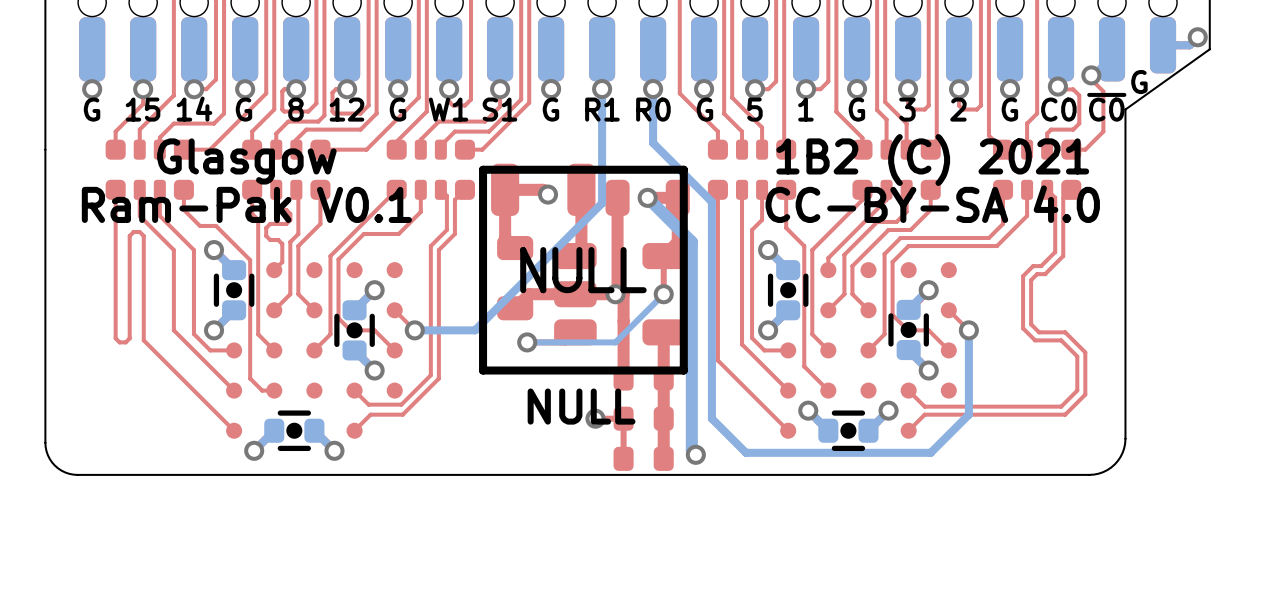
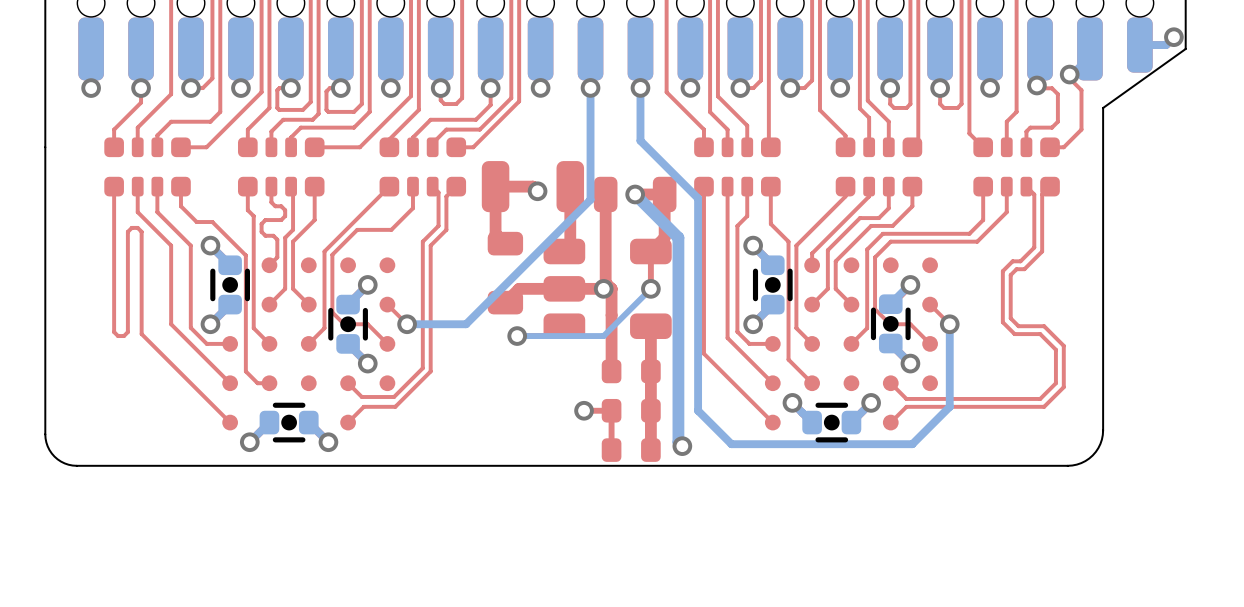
text: G (1139, 82) -> none
text: ~{C0} (1106, 107) -> none
text: G (92, 109) -> none
text: 15 (143, 109) -> none
text: 14 (194, 109) -> none
text: G (243, 109) -> none
text: 8 (296, 109) -> none
text: 12 (346, 109) -> none
text: G (397, 109) -> none
text: W1 (448, 109) -> none
text: S1 (499, 109) -> none
text: G (550, 109) -> none
text: R1 (602, 109) -> none
text: R0 (653, 109) -> none
text: G (704, 109) -> none
text: 5 (754, 109) -> none
text: 1 (805, 109) -> none
text: G (856, 109) -> none
text: 3 (907, 109) -> none
text: 2 (958, 109) -> none
text: G (1009, 109) -> none
text: C0 (1058, 109) -> none
text: 1B2 (C) 2021 (932, 160) -> none
text: Glasgow (246, 161) -> none
drawing: [479, 165, 688, 375] -> none
text: Ram-Pak V0.1 (246, 204) -> none
text: CC-BY-SA 4.0 (932, 204) -> none
text: NULL (581, 406) -> none

